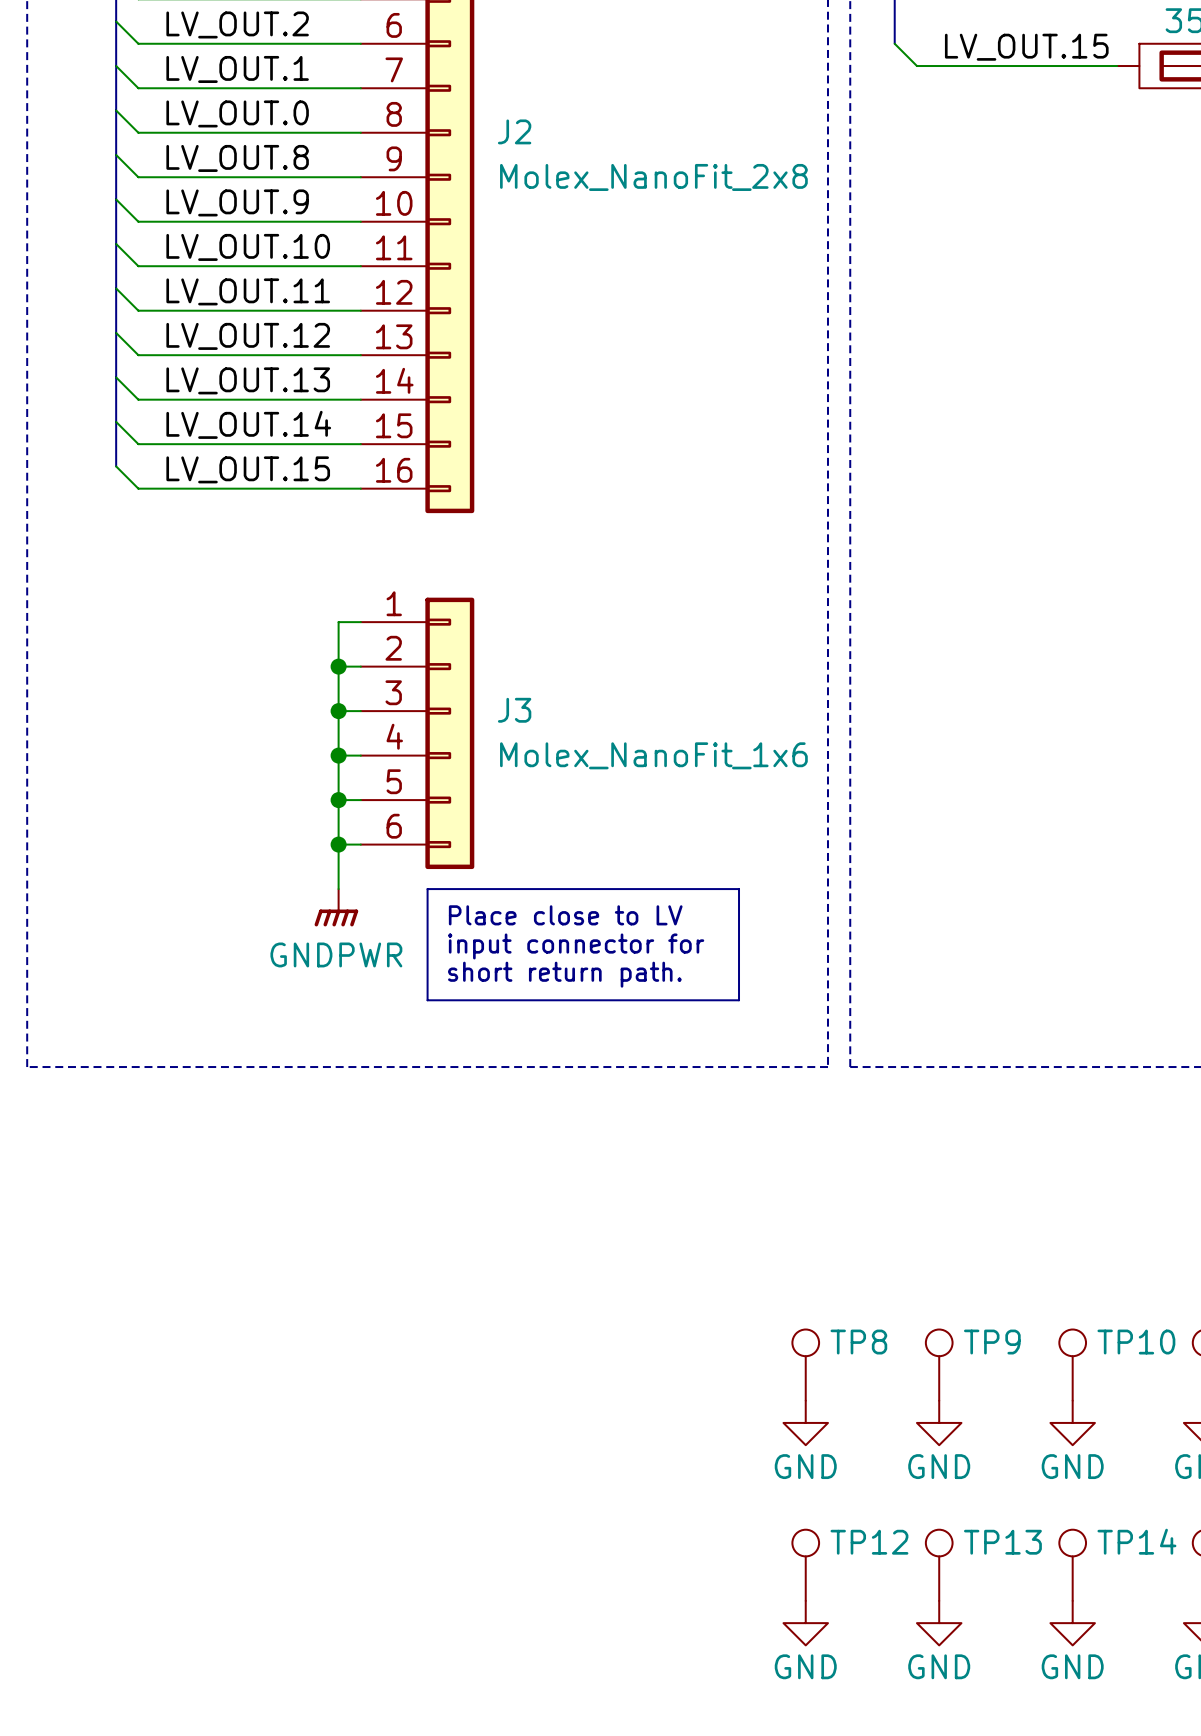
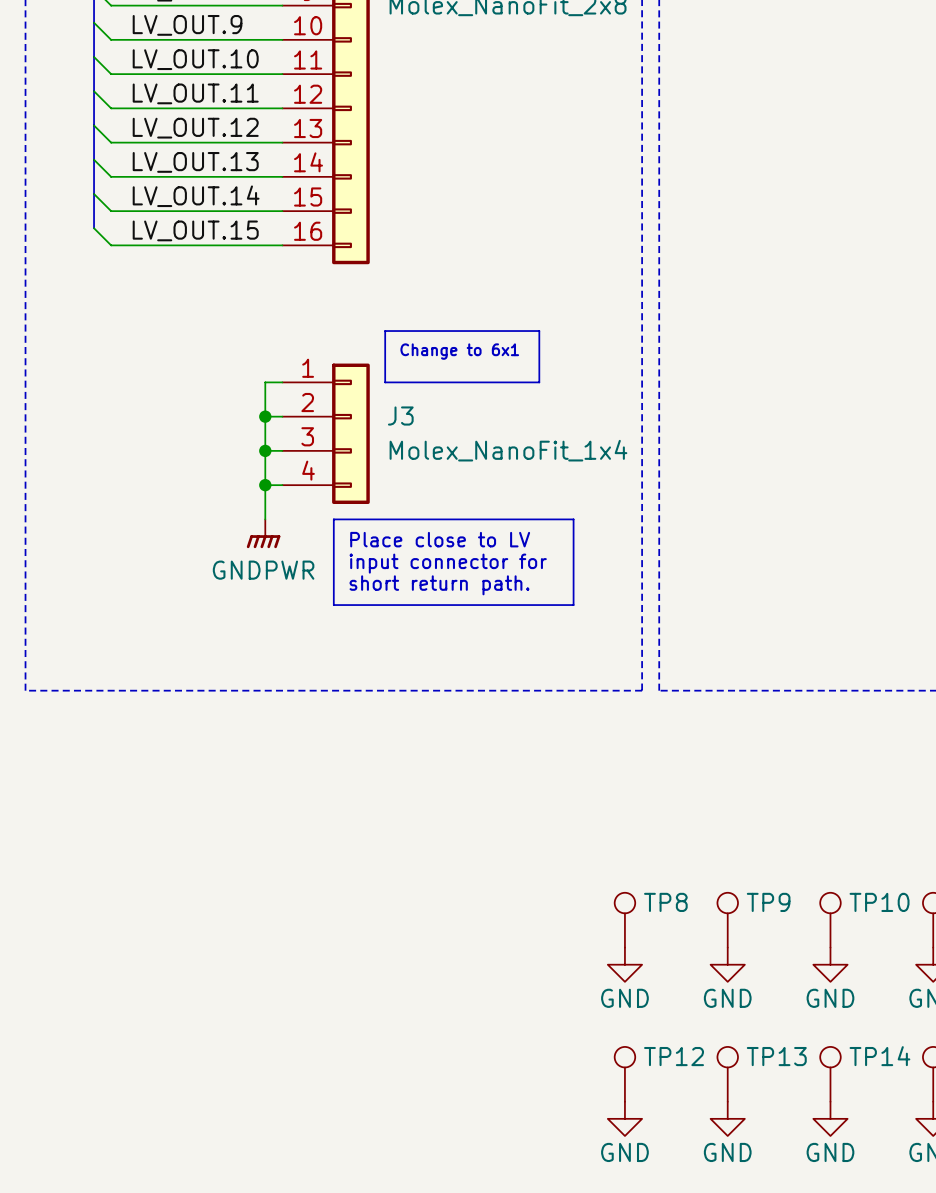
J3 symbol: [360, 597, 475, 870] -> [282, 363, 370, 504]
line: none -> (385, 331) (539, 331) (539, 382) (385, 382) (385, 331)
wire: (360, 622) (338, 622) (338, 666) -> none
text: none -> Change to 6x1 (459, 351)
junction: (338, 666) -> none
J3 value: Molex_NanoFit_1x6 (653, 755) -> Molex_NanoFit_1x4 (508, 450)
junction: (338, 844) -> none
wire: (360, 844) (338, 844) (338, 889) -> none
line: (427, 889) (739, 889) -> (333, 553) (333, 519) (573, 519) (573, 553)
power symbol position: GNDPWR (336, 907) -> GNDPWR (263, 533)
text position: Place close to LV (565, 915) -> Place close to LV (440, 539)
text position: input connector for (576, 946) -> input connector for (448, 563)
line: (427, 955) (427, 1000) (739, 1000) (739, 955) -> (333, 605) (573, 605)
text position: short return path. (564, 974) -> short return path. (439, 585)

